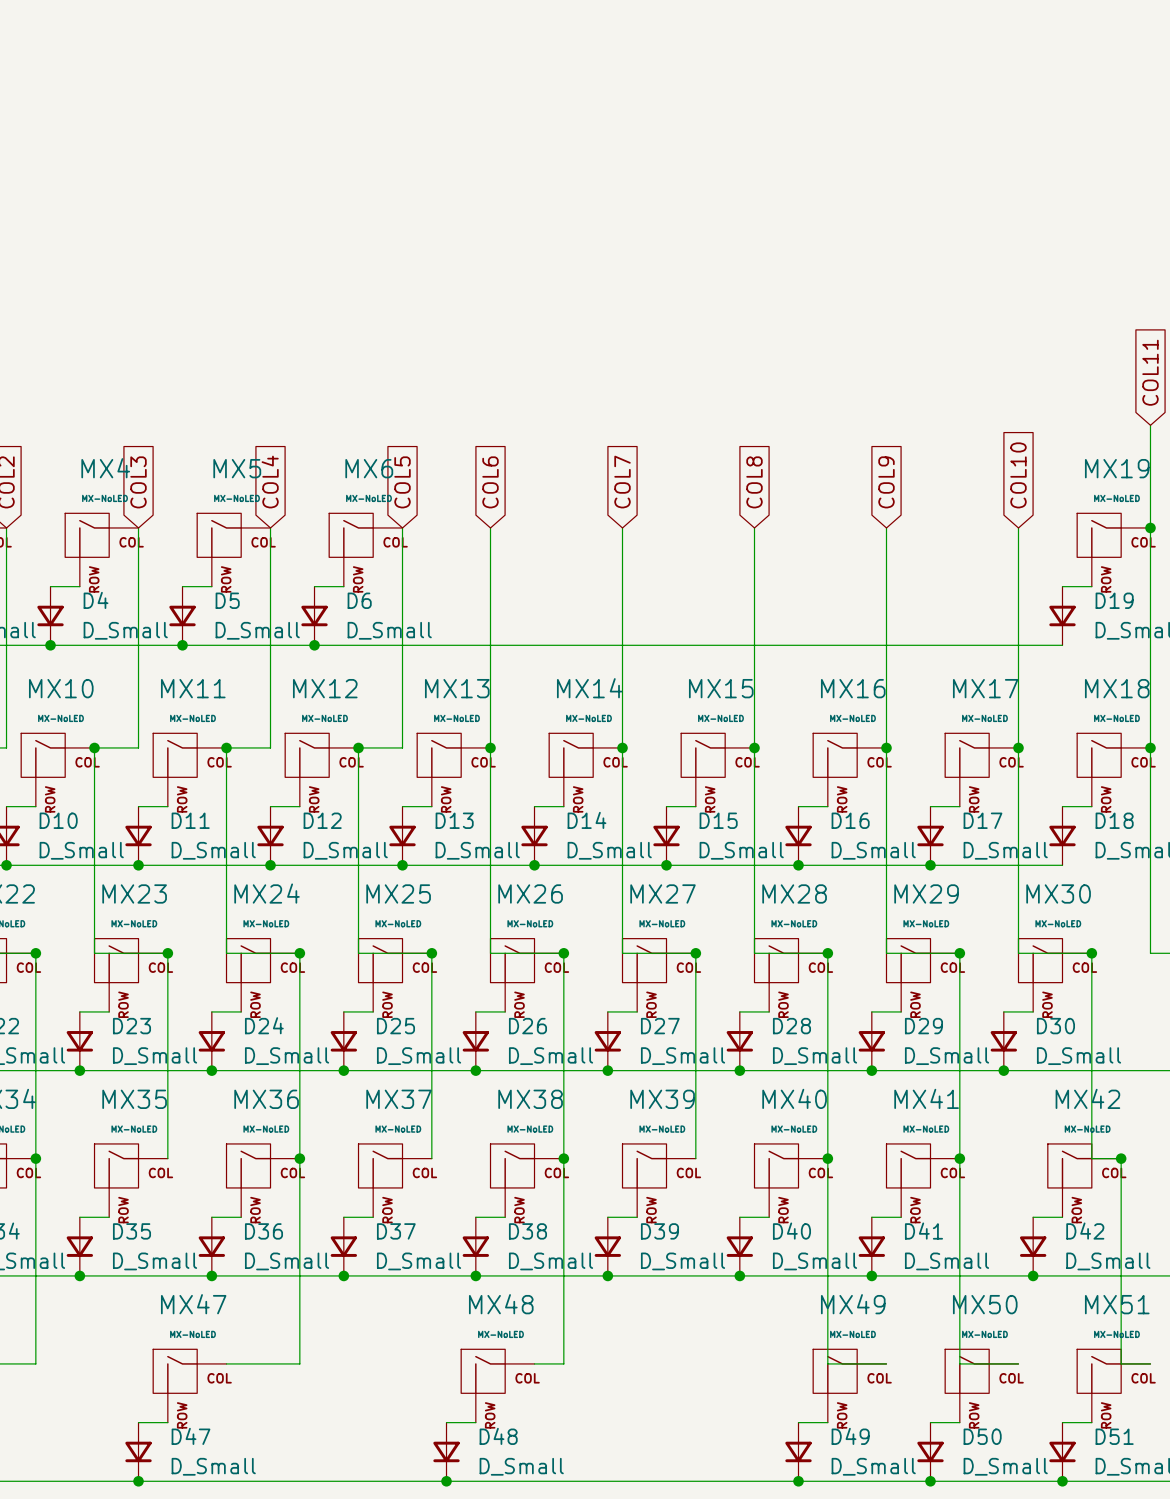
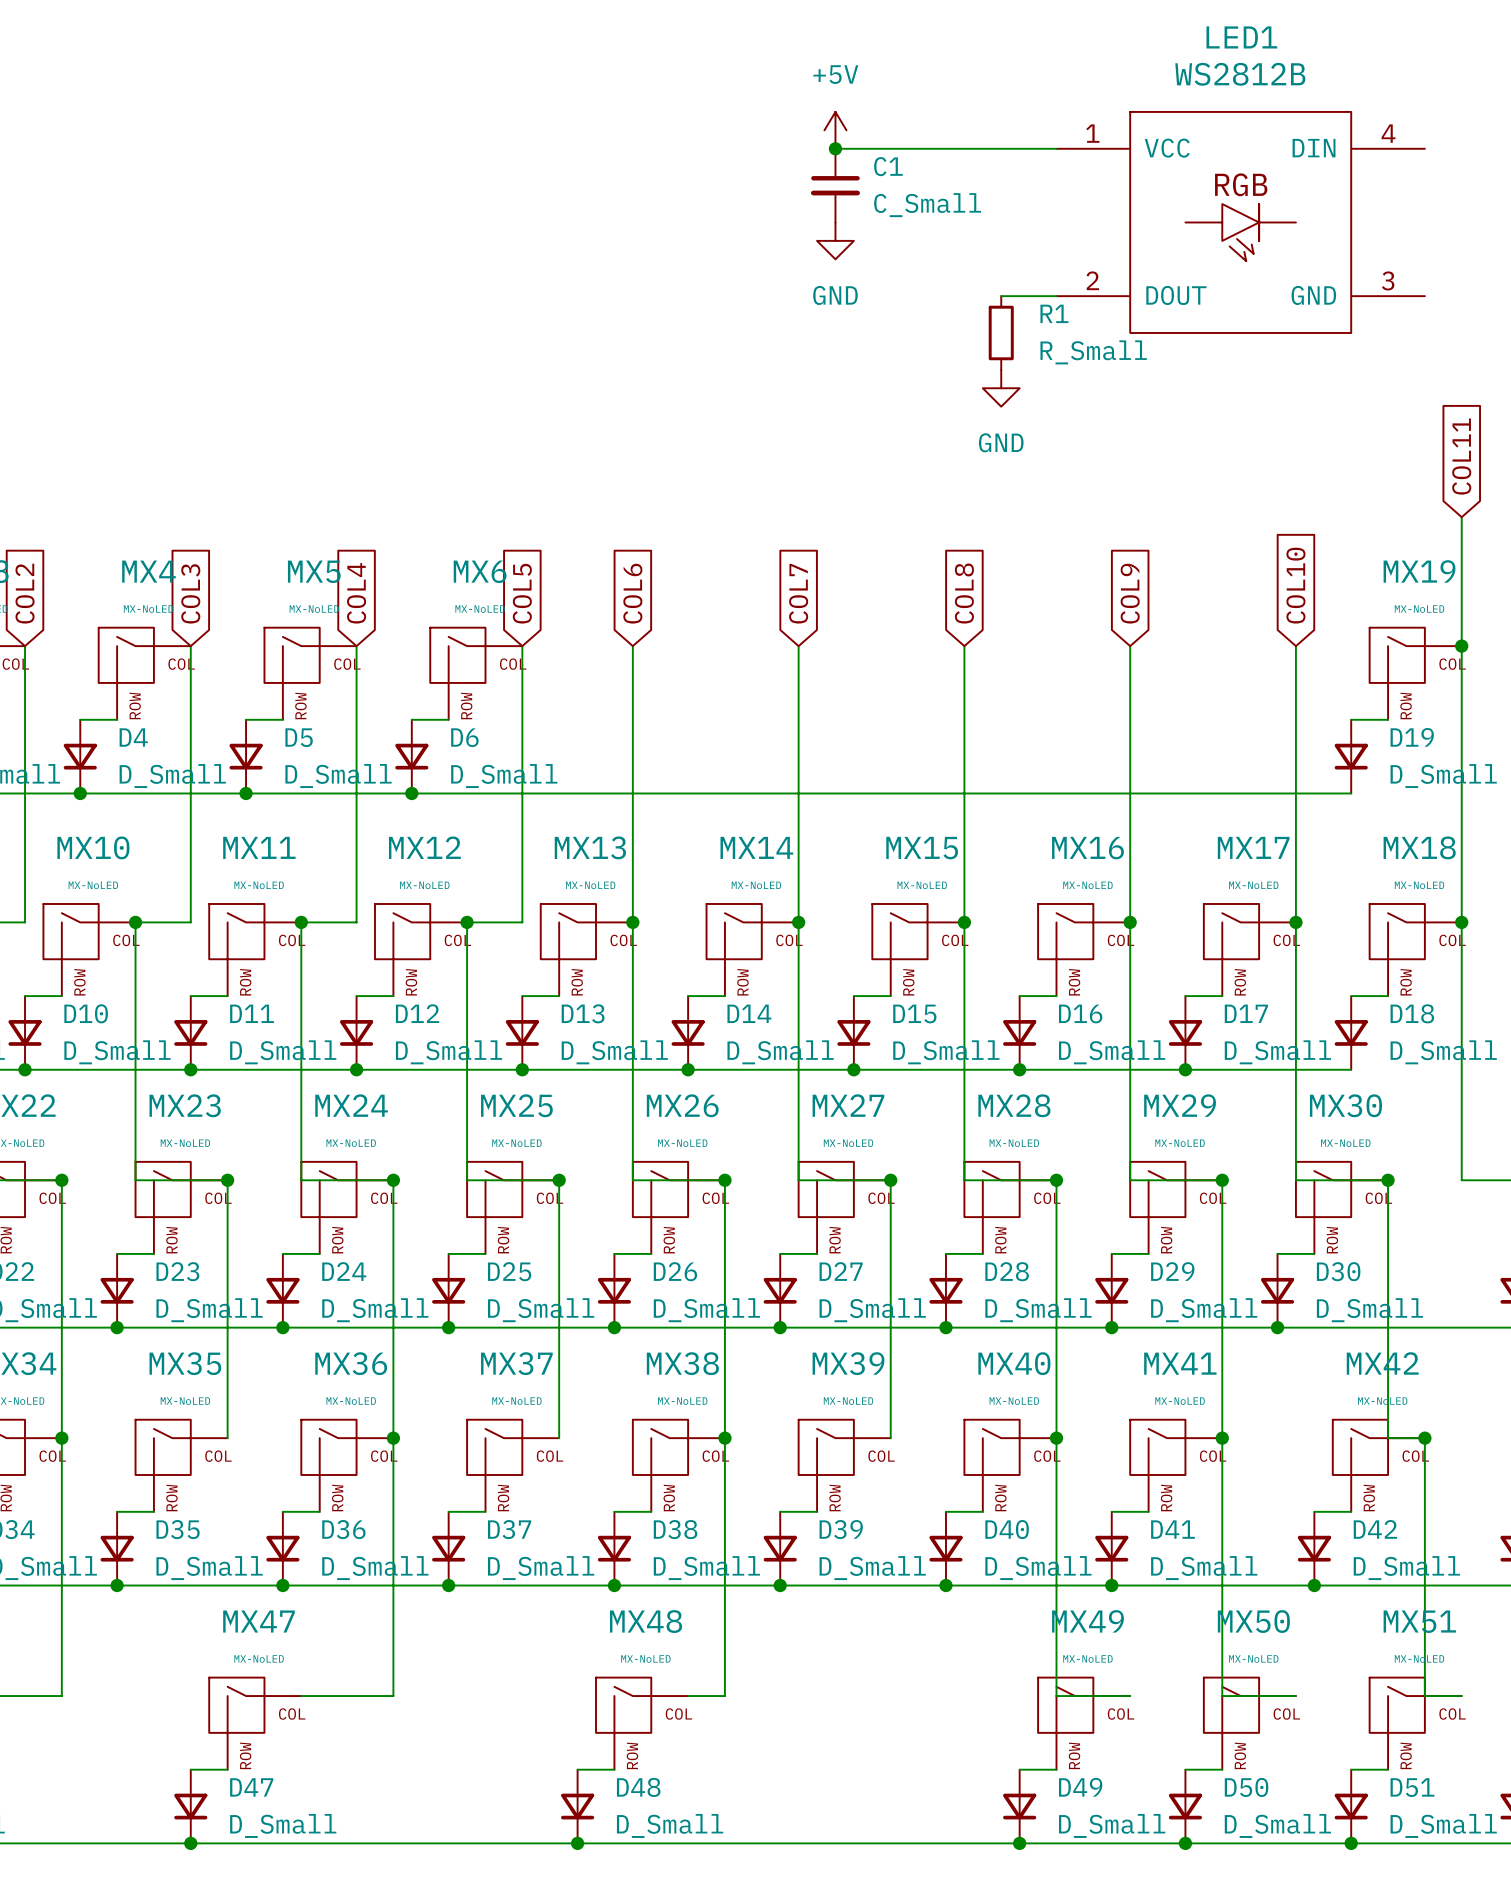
power symbol: none -> +5V (835, 130)
wire: none -> (835, 148) (1056, 148)
junction: none -> (835, 148)
C1: none -> C_Small (835, 185)
LED1: none -> WS2812B (1240, 222)
power symbol: none -> GND (835, 240)
wire: none -> (1001, 296) (1056, 296)
R1: none -> R_Small (1001, 332)
power symbol: none -> GND (1001, 388)

